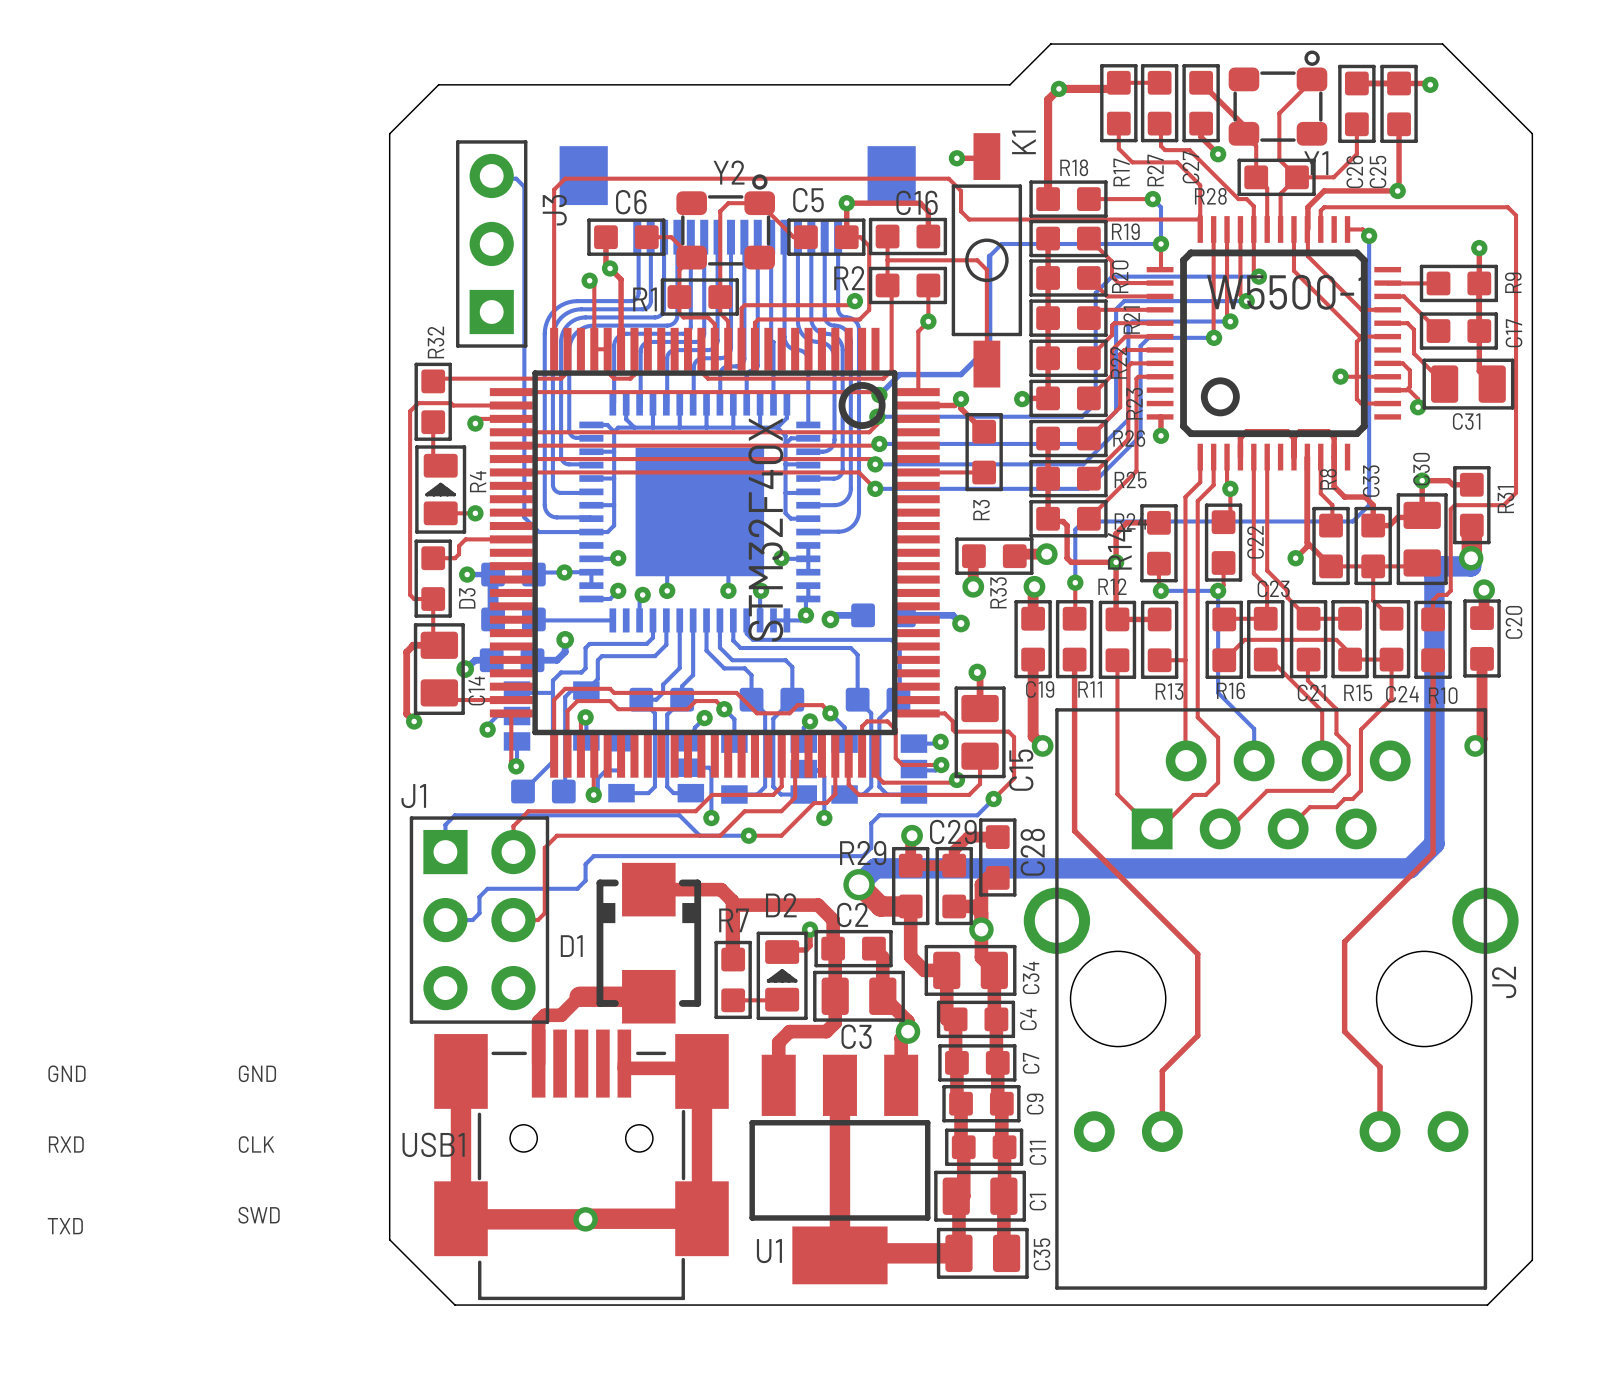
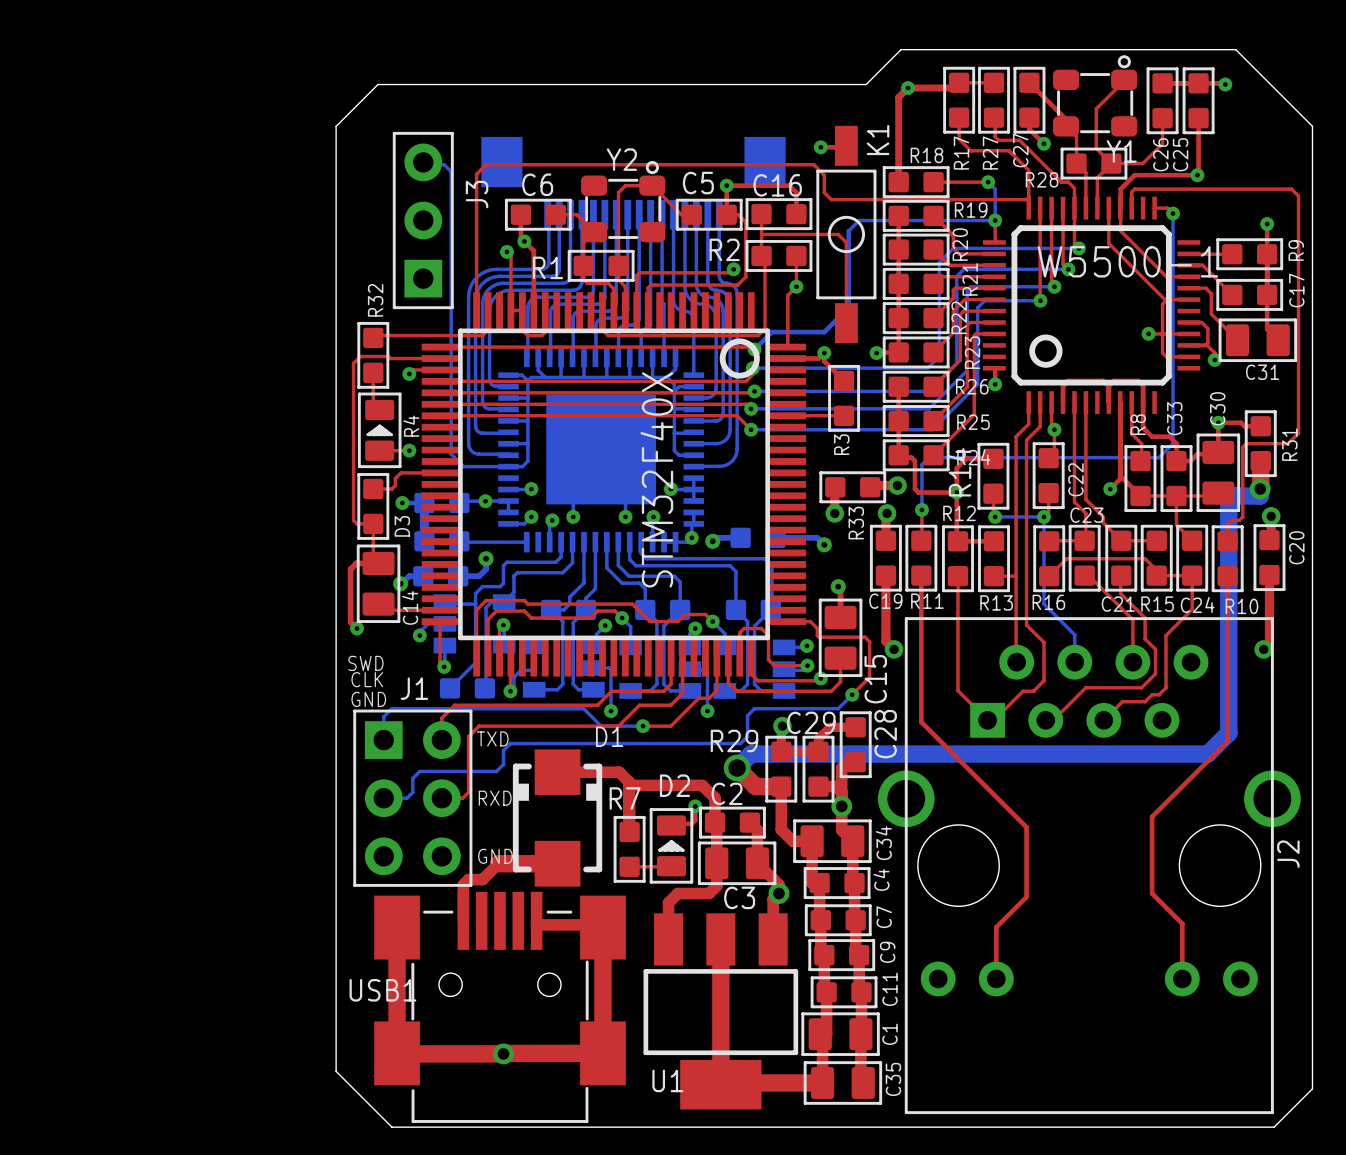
J1 name position: J1 (413, 796) -> J1 (414, 688)
text: none -> GND (368, 699)
D1 name position: D1 (571, 946) -> D1 (609, 736)
text: none -> GND (495, 856)
text: GND (67, 1073) -> none
text: GND (257, 1073) -> none
text position: RXD (66, 1144) -> RXD (495, 798)
text position: CLK (256, 1144) -> CLK (367, 679)
text position: SWD (259, 1215) -> SWD (365, 663)
text position: TXD (65, 1226) -> TXD (492, 738)

